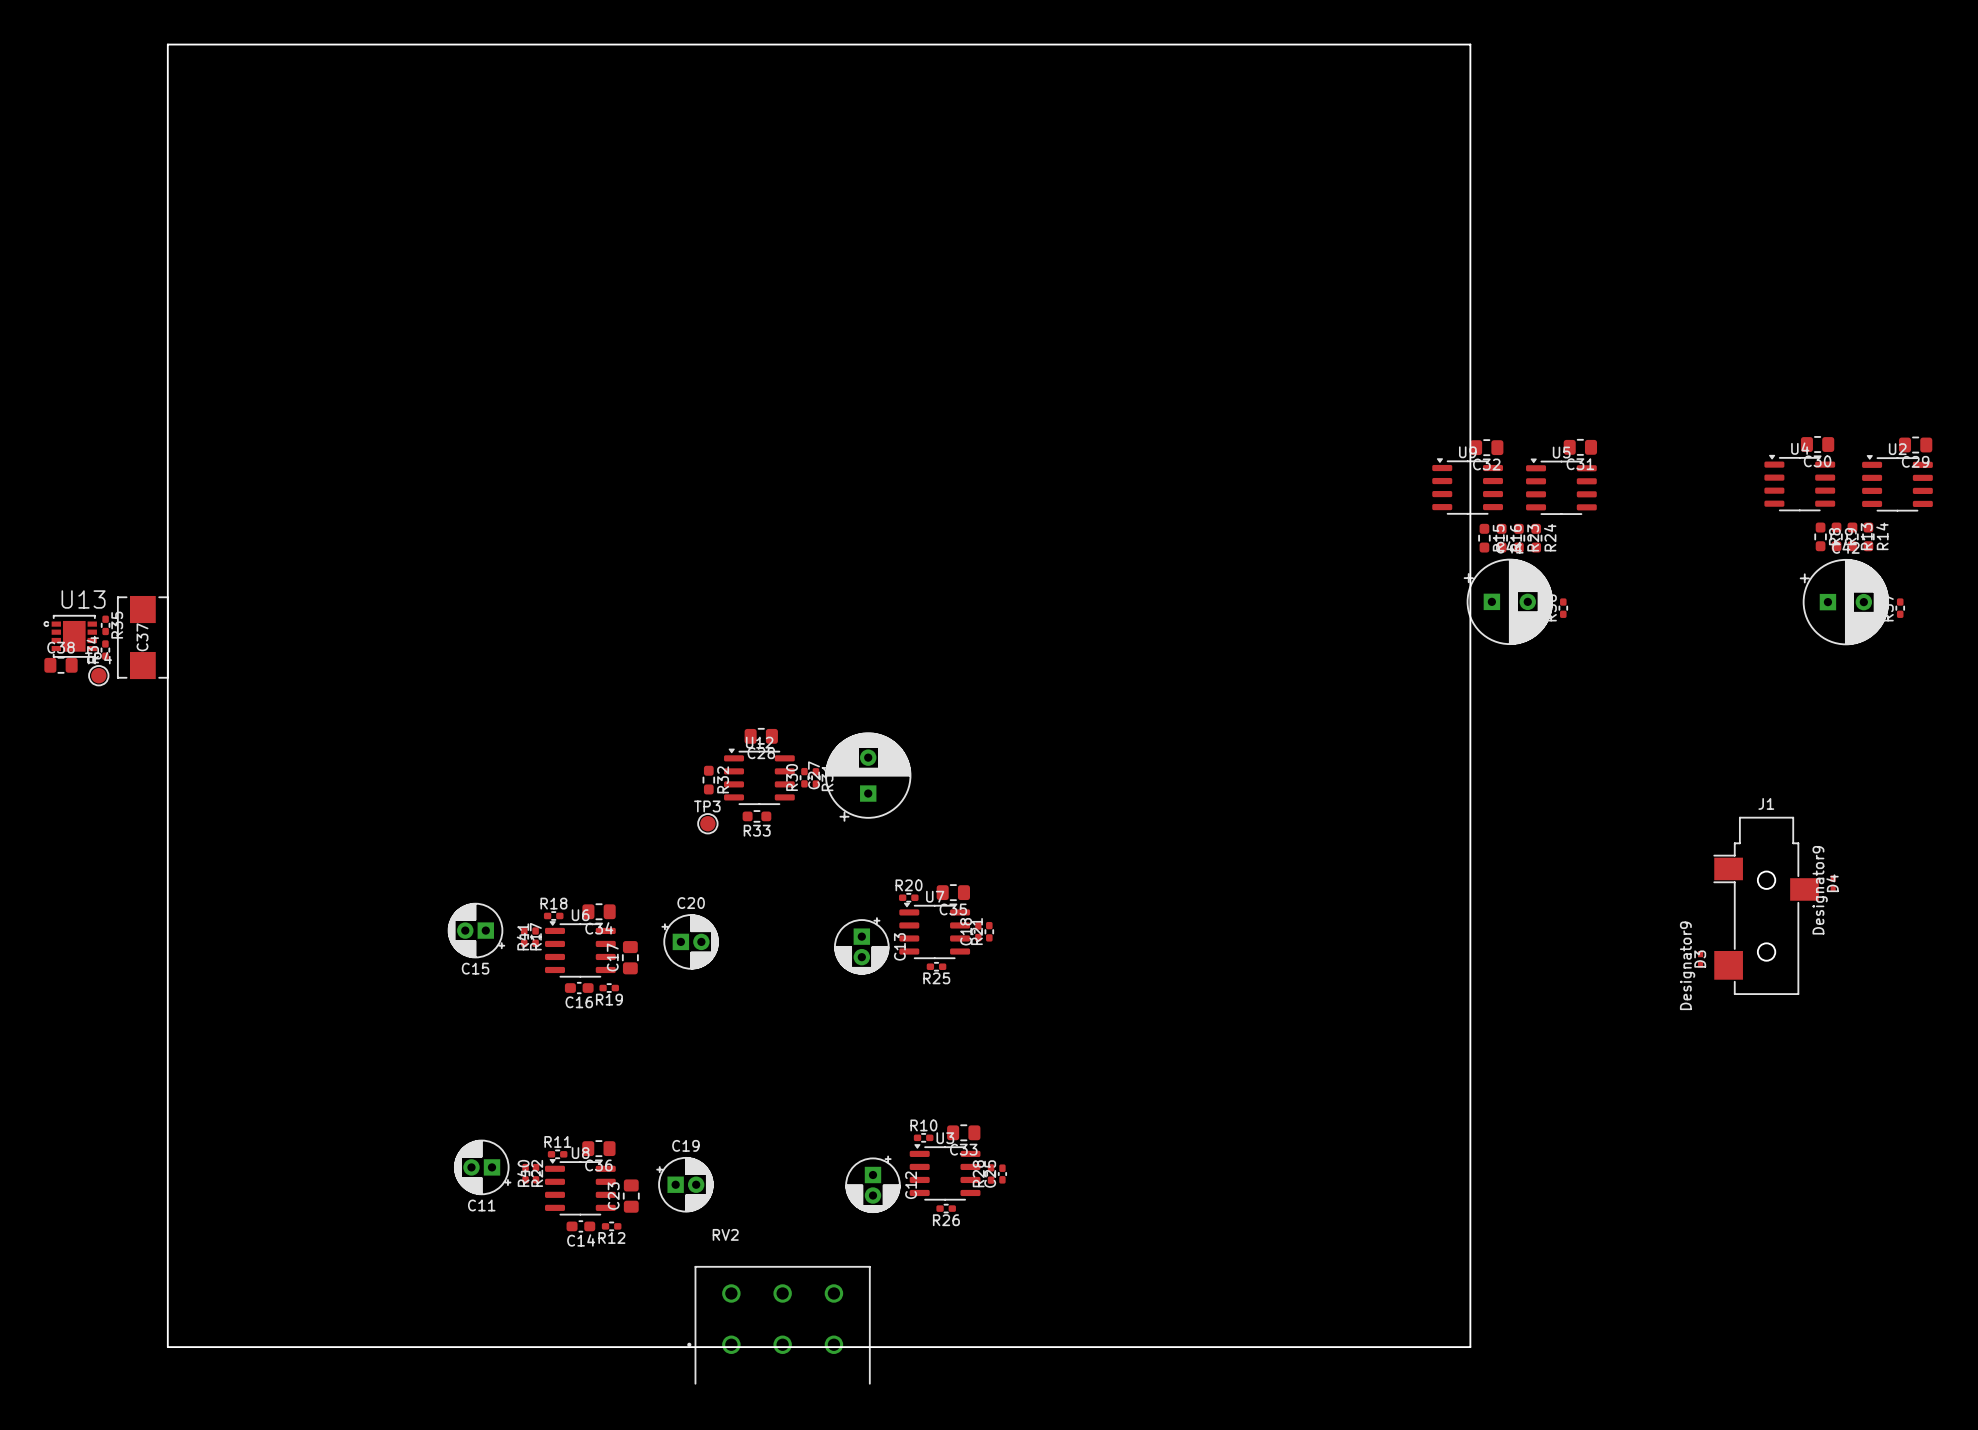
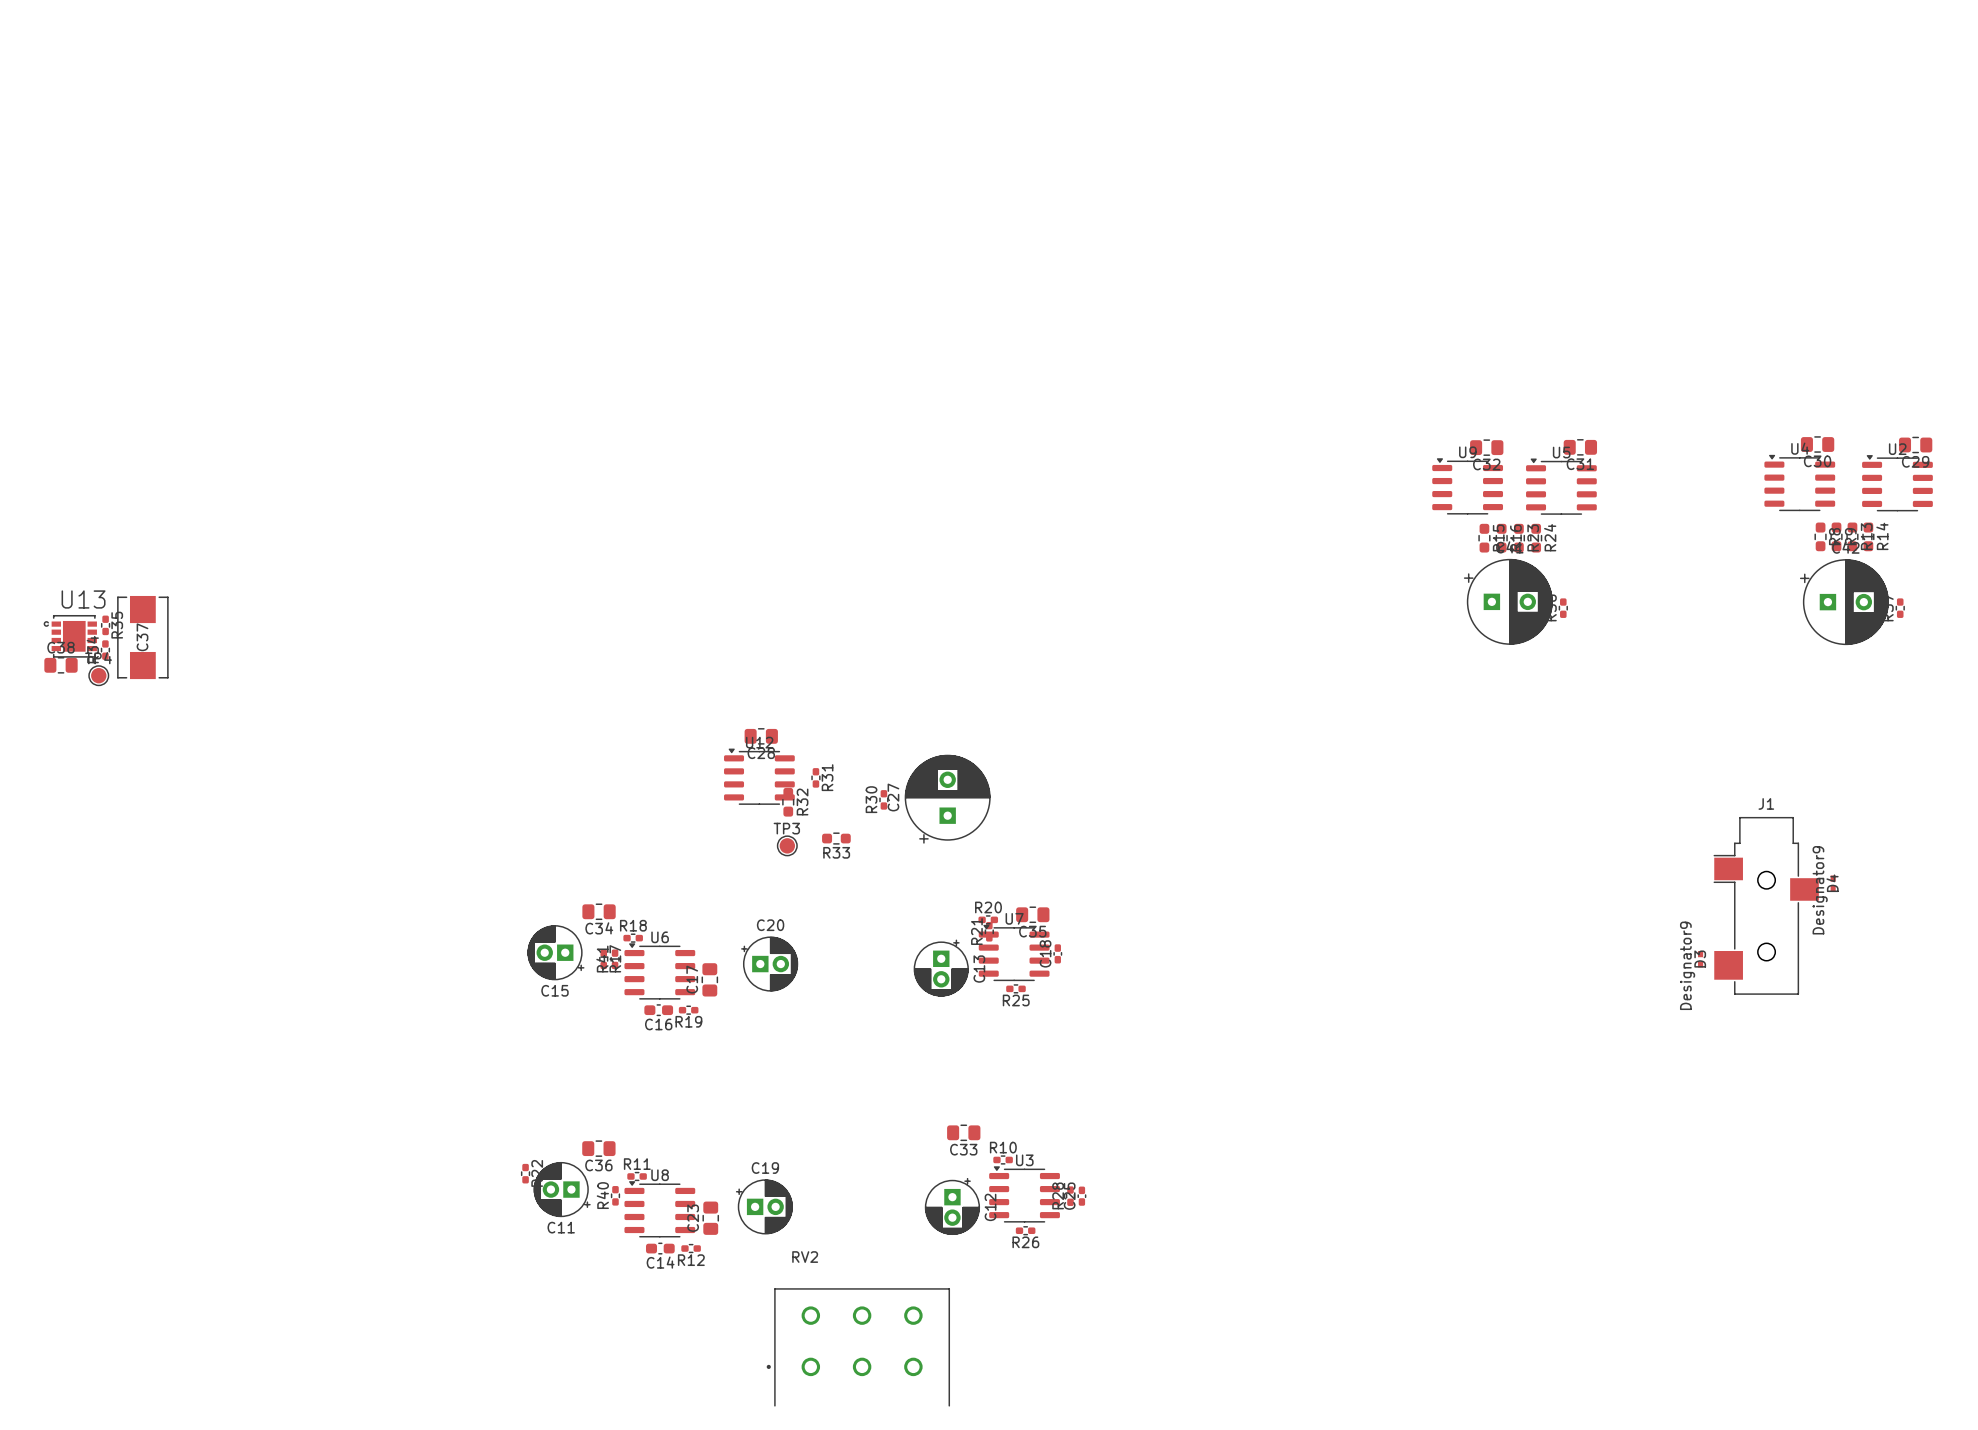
board edge: (167, 44) (1470, 44) (1470, 1347) (167, 1347) (167, 44) -> none
R30 position: (804, 777) -> (883, 799)
C27 position: (868, 777) -> (947, 799)
R32 position: (708, 780) -> (788, 802)
R33 position: (756, 816) -> (836, 838)
TP3 position: (707, 823) -> (787, 845)
C35 position: (953, 892) -> (1032, 914)
R20 position: (908, 897) -> (988, 919)
R18 position: (553, 915) -> (633, 938)
C15 position: (476, 930) -> (555, 952)
U7 position: (934, 930) -> (1014, 952)
C18 position: (978, 931) -> (1057, 953)
R17 position: (524, 937) -> (603, 959)
R41 position: (535, 937) -> (615, 959)
C20 position: (690, 941) -> (769, 964)
C13 position: (861, 945) -> (941, 968)
U6 position: (580, 949) -> (659, 971)
C17 position: (630, 957) -> (709, 979)
R25 position: (936, 966) -> (1015, 988)
C16 position: (579, 988) -> (658, 1010)
R19 position: (609, 988) -> (688, 1010)
R10 position: (923, 1137) -> (1003, 1159)
R11 position: (557, 1154) -> (637, 1176)
C11 position: (482, 1167) -> (562, 1189)
U3 position: (945, 1172) -> (1024, 1194)
R40 position: (536, 1173) -> (615, 1195)
R28 position: (991, 1174) -> (1070, 1196)
C25 position: (1002, 1174) -> (1081, 1196)
C19 position: (684, 1184) -> (764, 1206)
C12 position: (872, 1184) -> (952, 1206)
U8 position: (580, 1187) -> (659, 1209)
C23 position: (631, 1196) -> (710, 1218)
R26 position: (946, 1208) -> (1025, 1230)
C14 position: (580, 1226) -> (660, 1248)
R12 position: (611, 1226) -> (691, 1248)
RV2 position: (778, 1325) -> (858, 1347)

